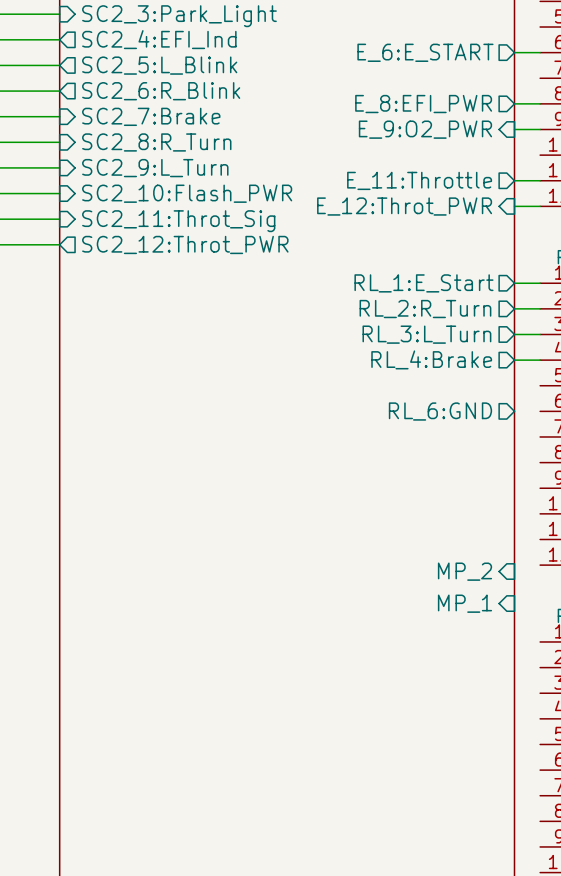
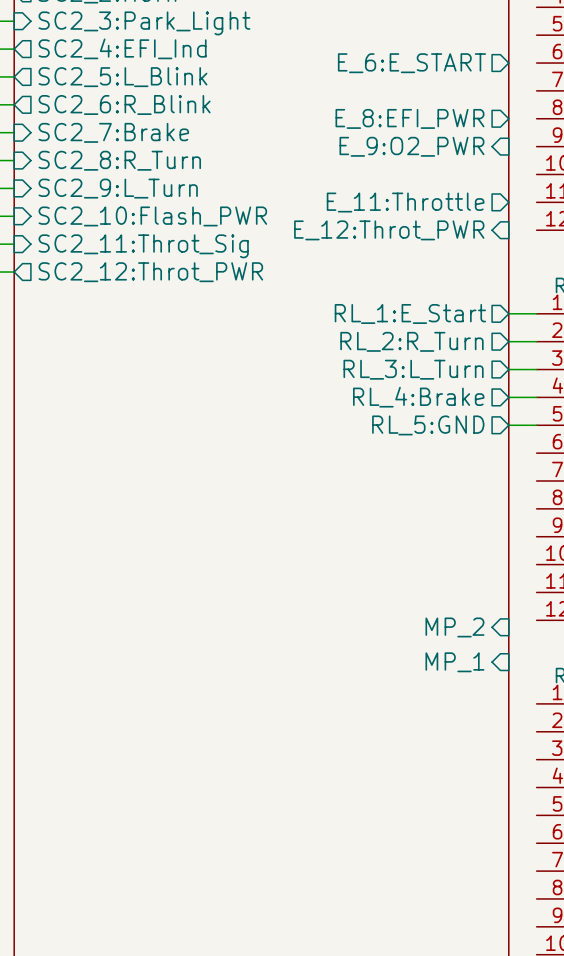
wire: (514, 52) (540, 52) -> none
wire: (514, 103) (540, 103) -> none
wire: (514, 129) (540, 129) -> none
wire: (514, 180) (540, 180) -> none
wire: (514, 206) (540, 206) -> (508, 425) (536, 425)
sheet pin: RL_6:GND (440, 411) -> RL_5:GND (428, 425)

